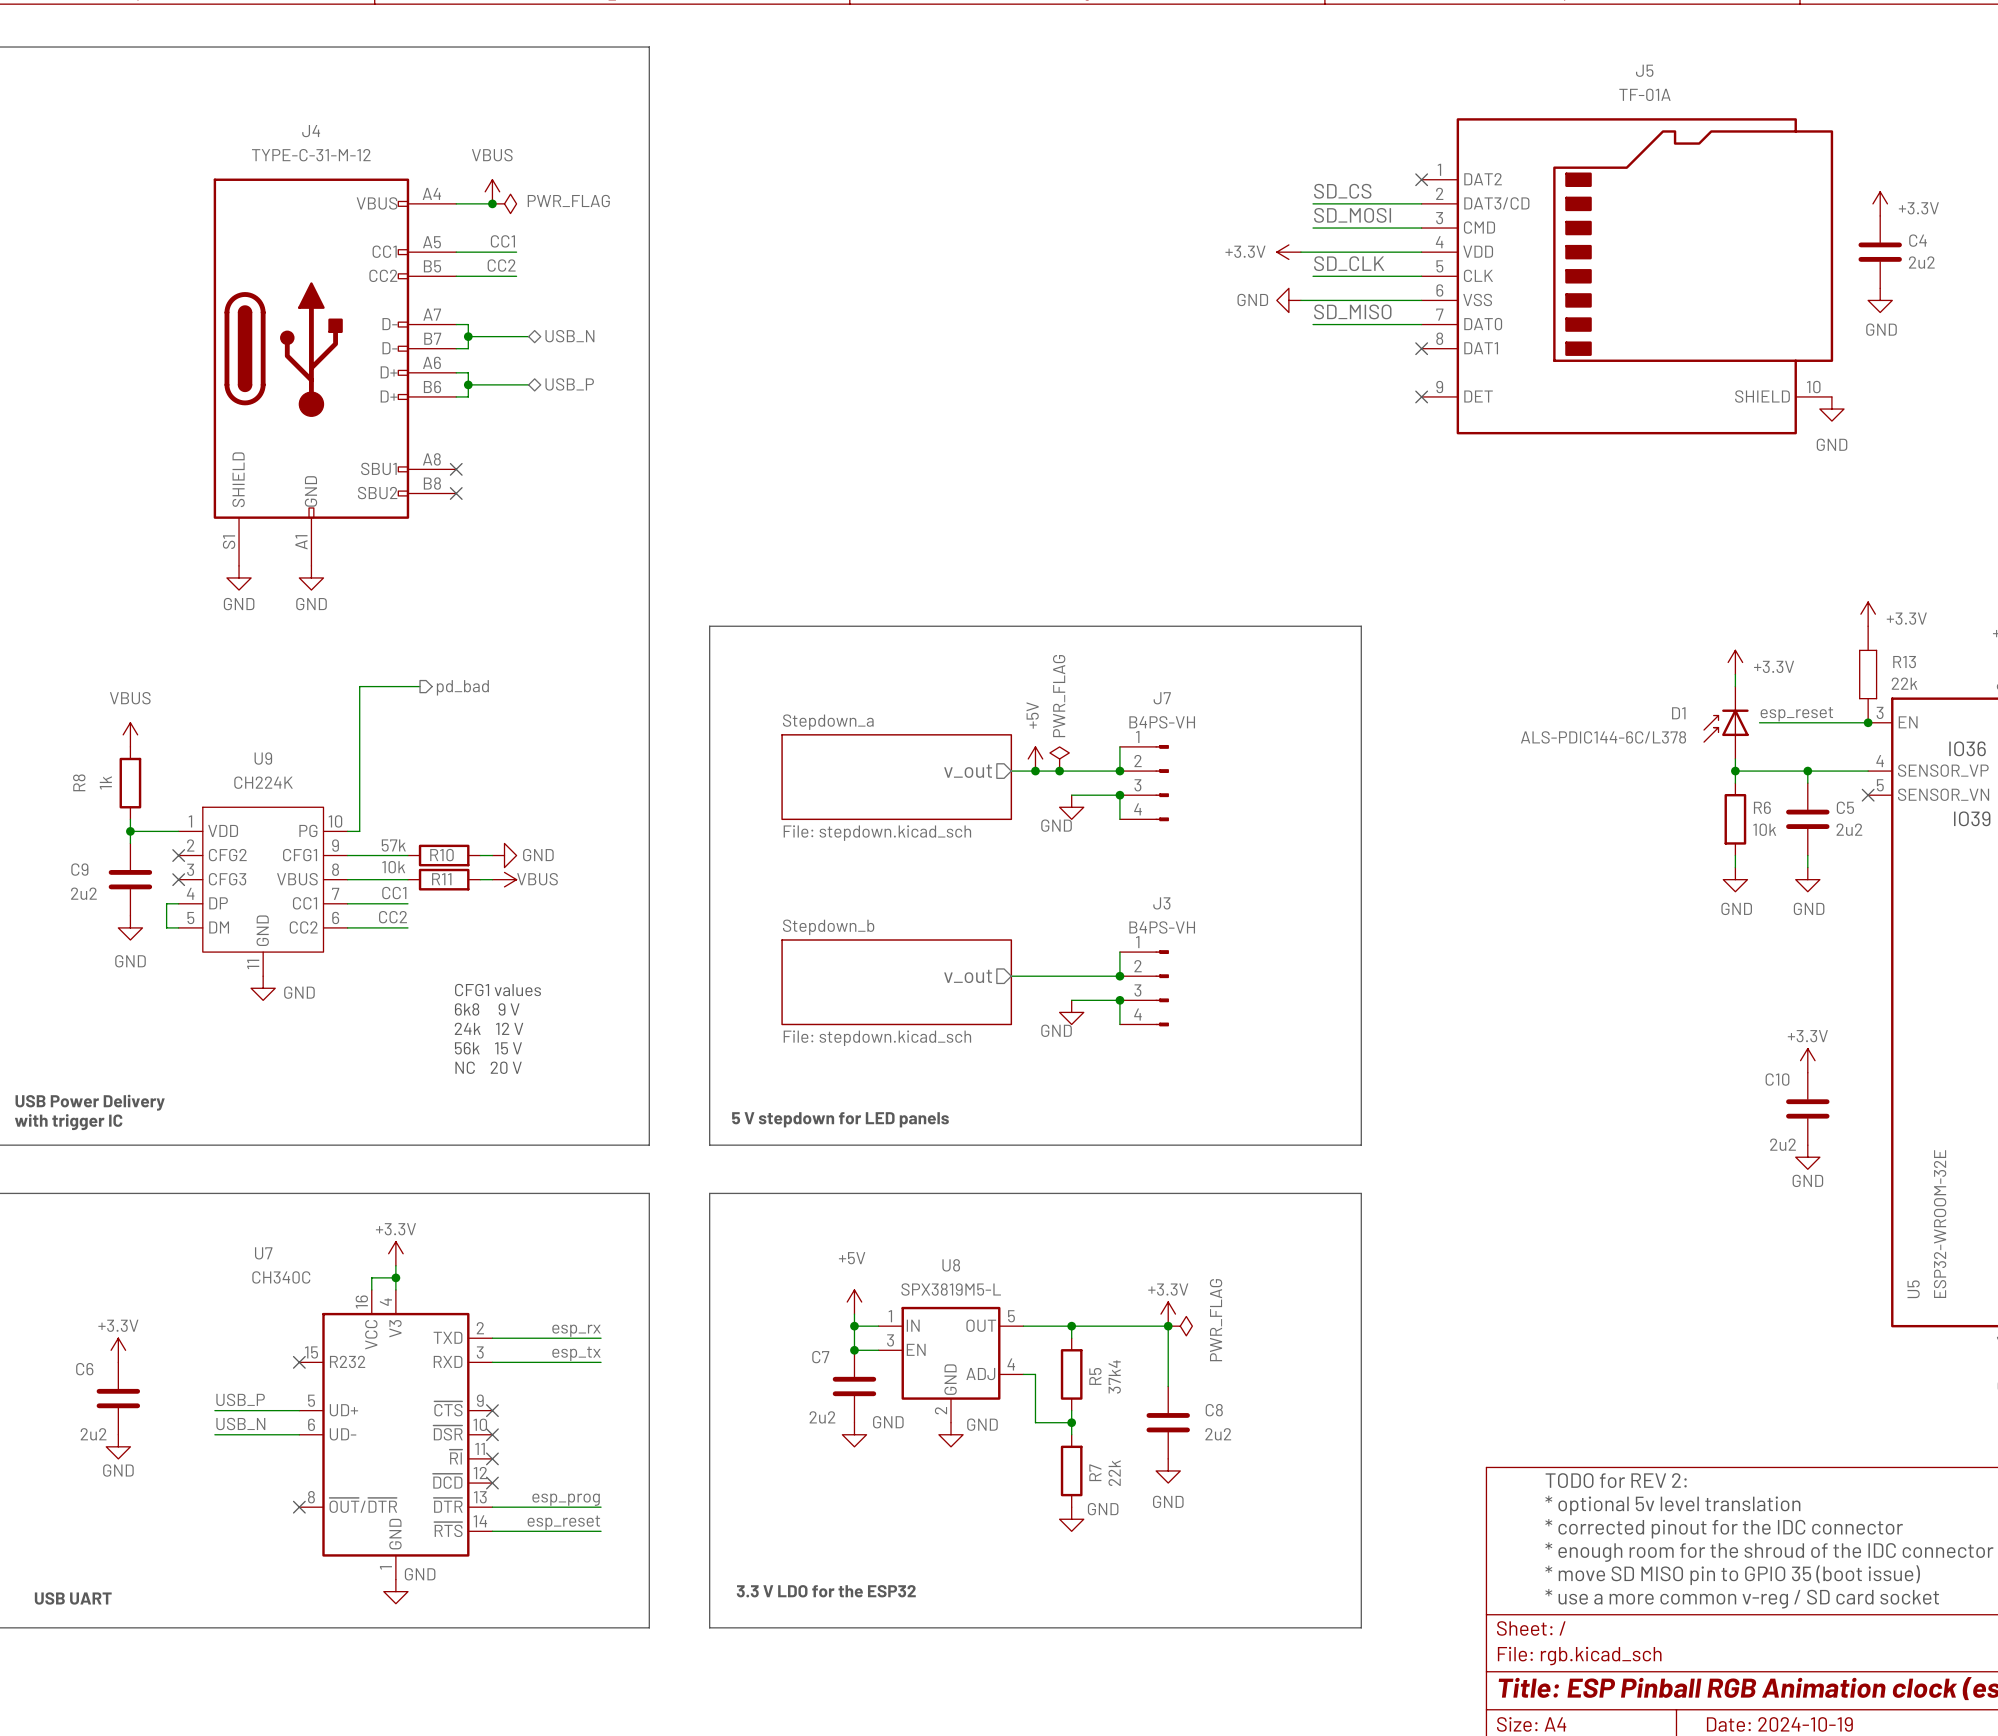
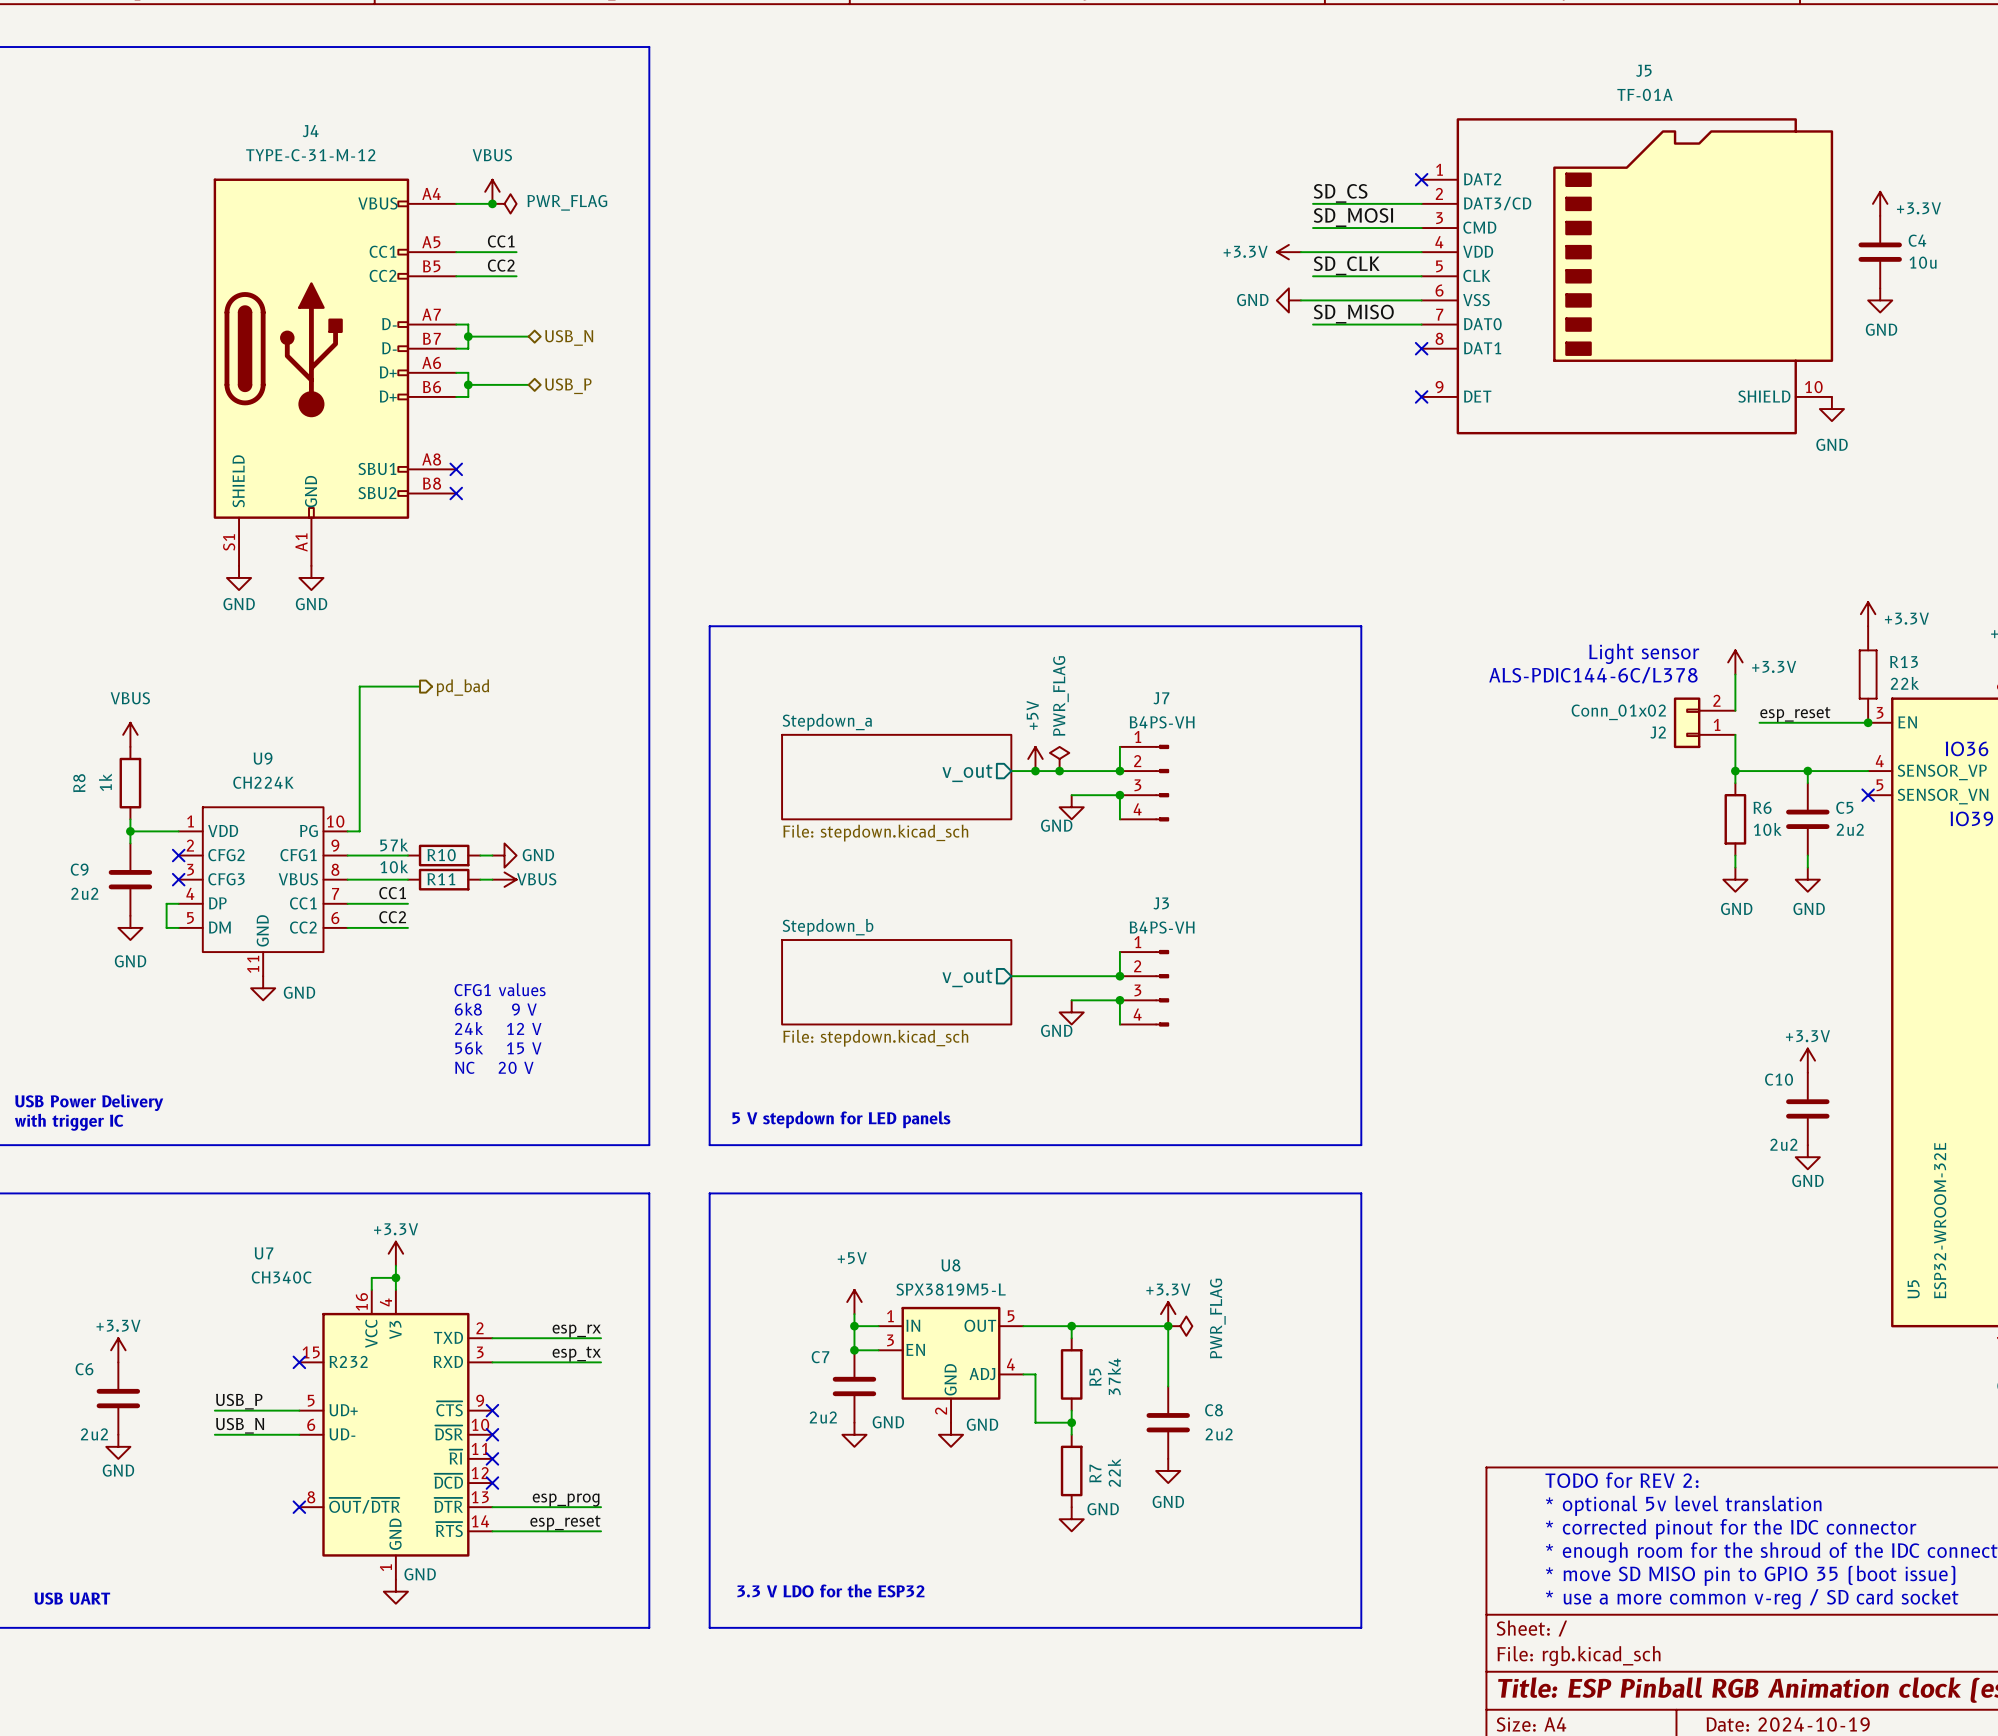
C4 value: 2u2 (1921, 262) -> 10u (1923, 262)
text: none -> Light sensor (1644, 653)
text: none -> ALS-PDIC144-6C/L378 (1593, 675)
J2: none -> Conn_01x02 (1704, 722)
D1: ALS-PDIC144-6C/L378 (1726, 722) -> none

